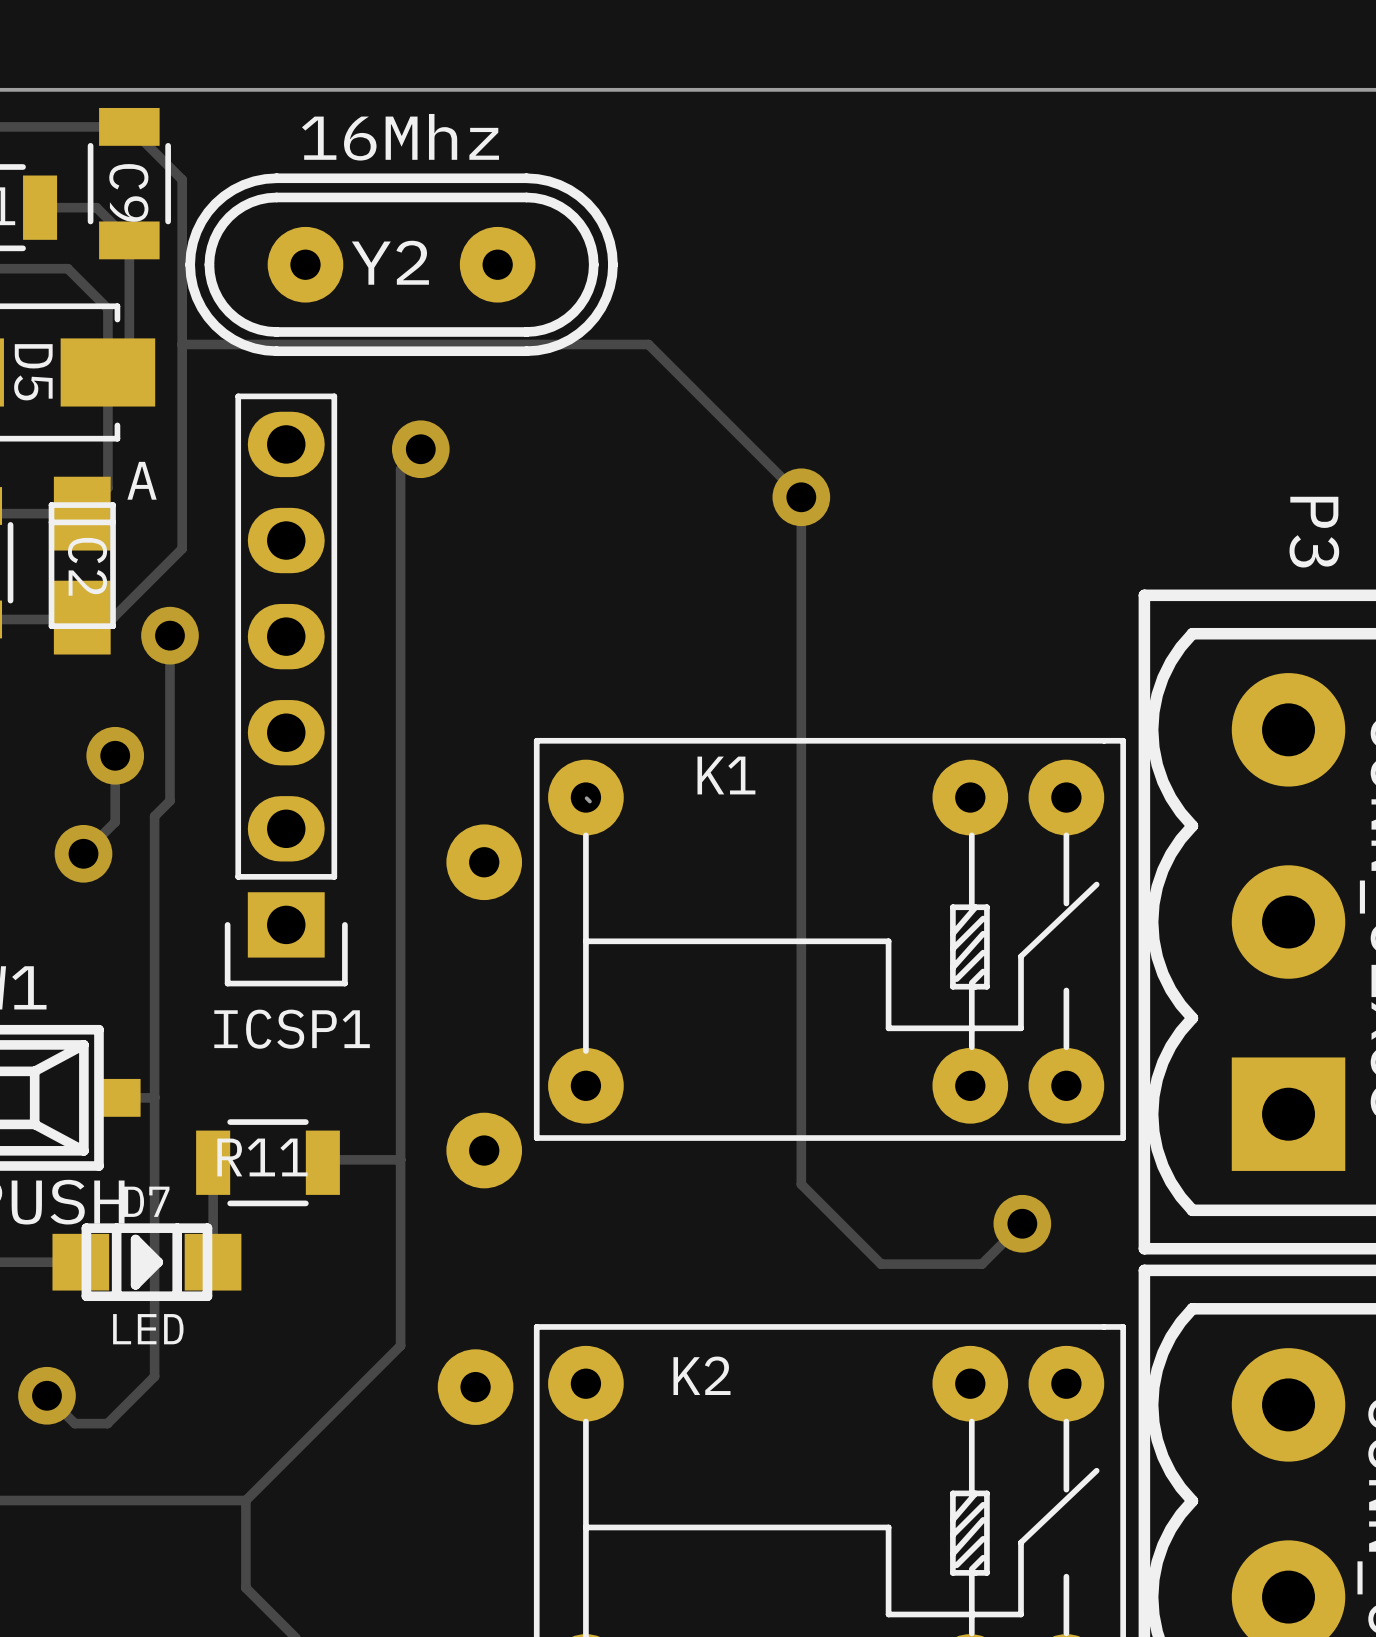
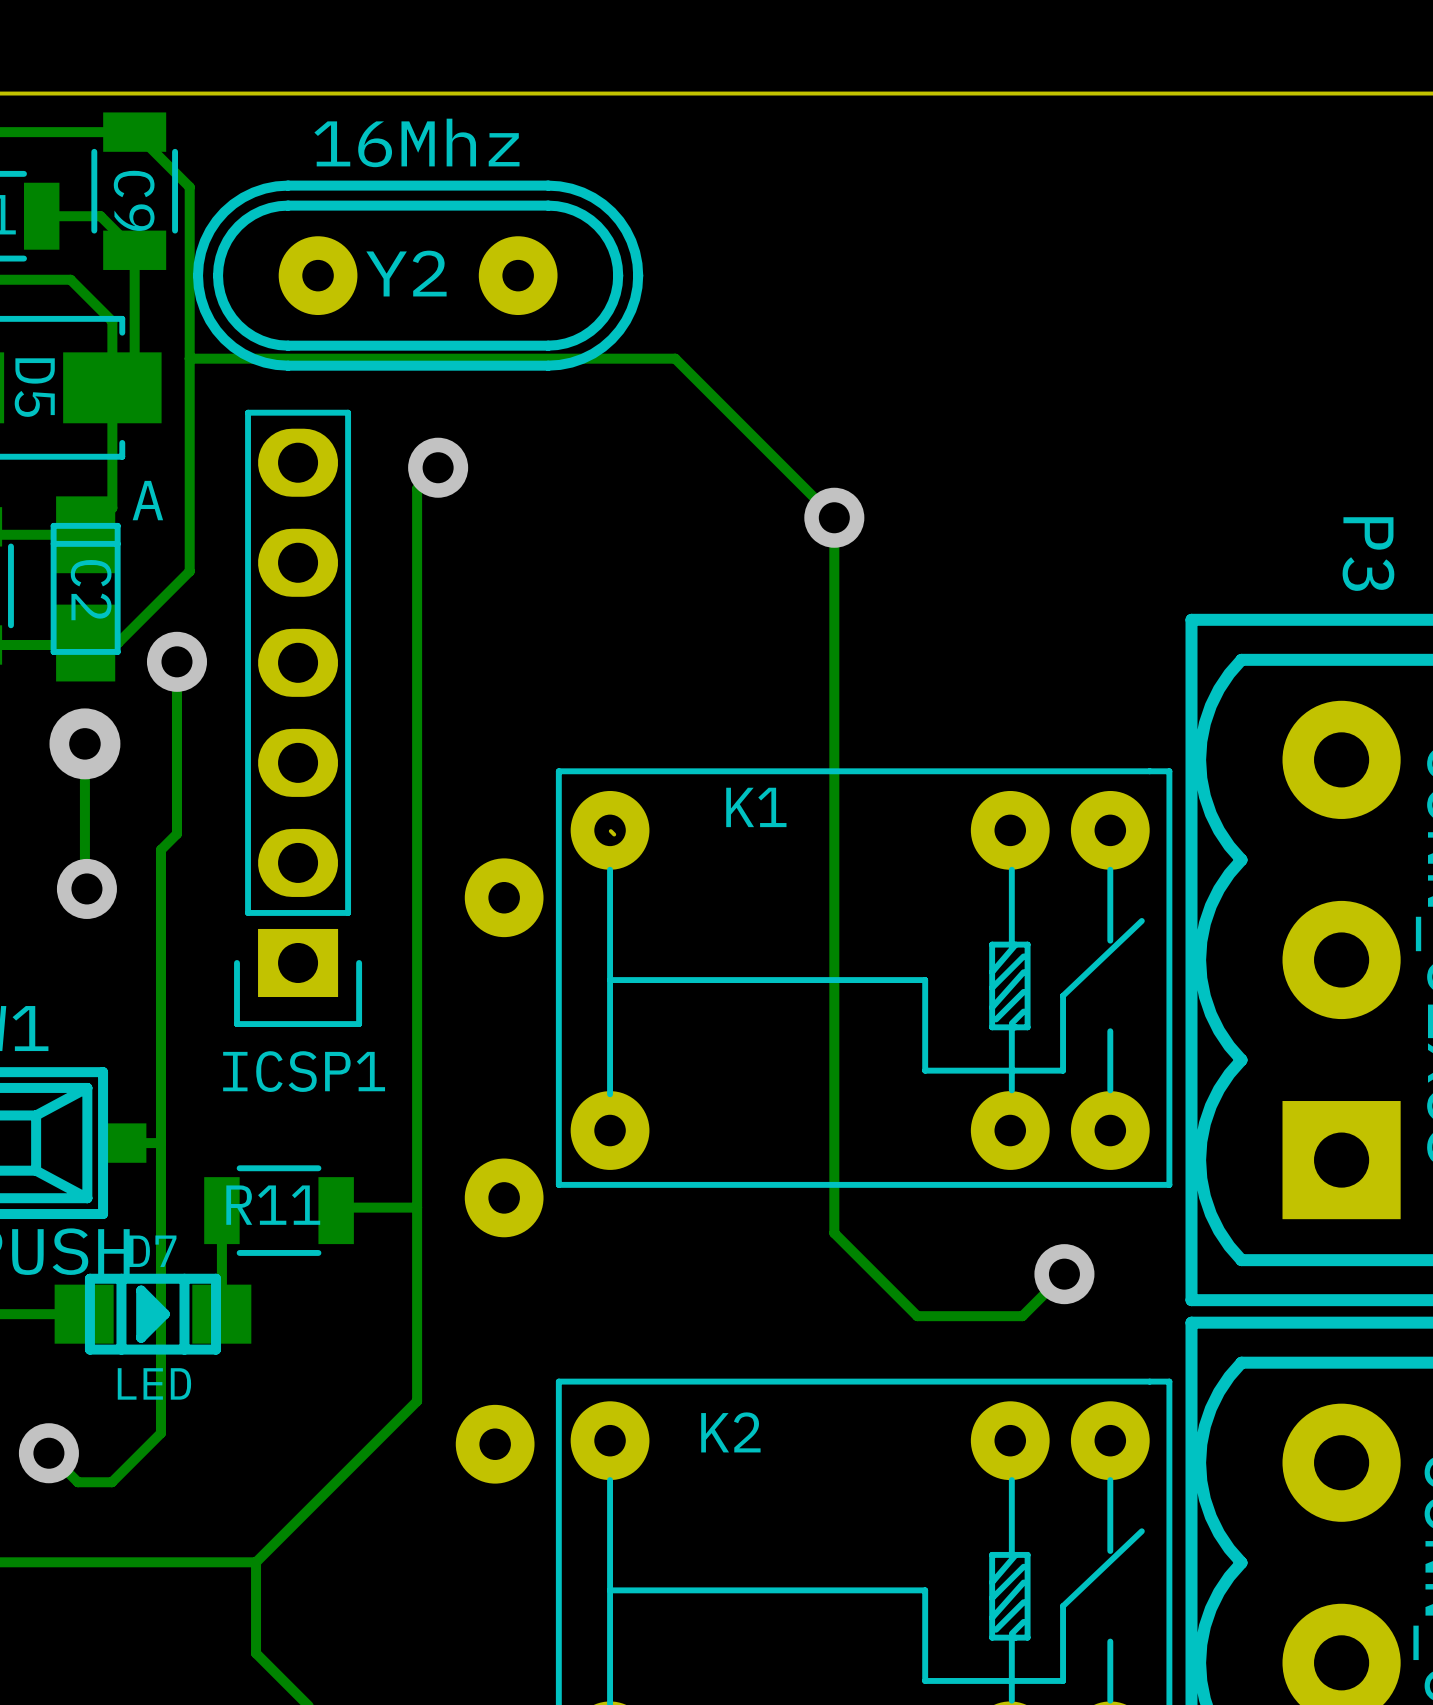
via: none -> (84, 743)
track: (115, 755) (115, 822) (83, 853) -> (84, 743) (84, 886) (86, 888)
via: (115, 755) -> none

